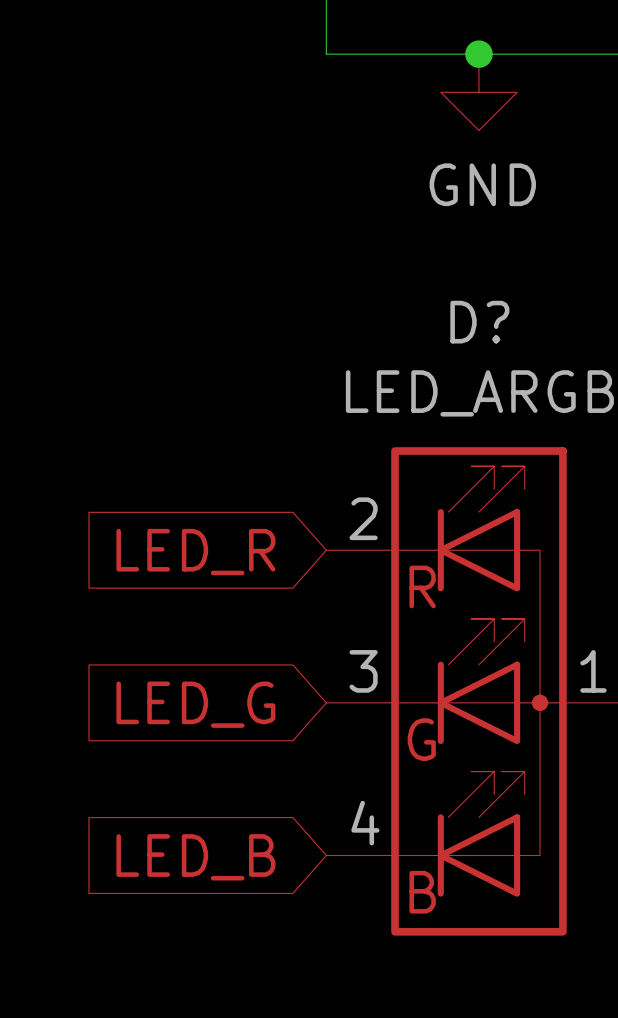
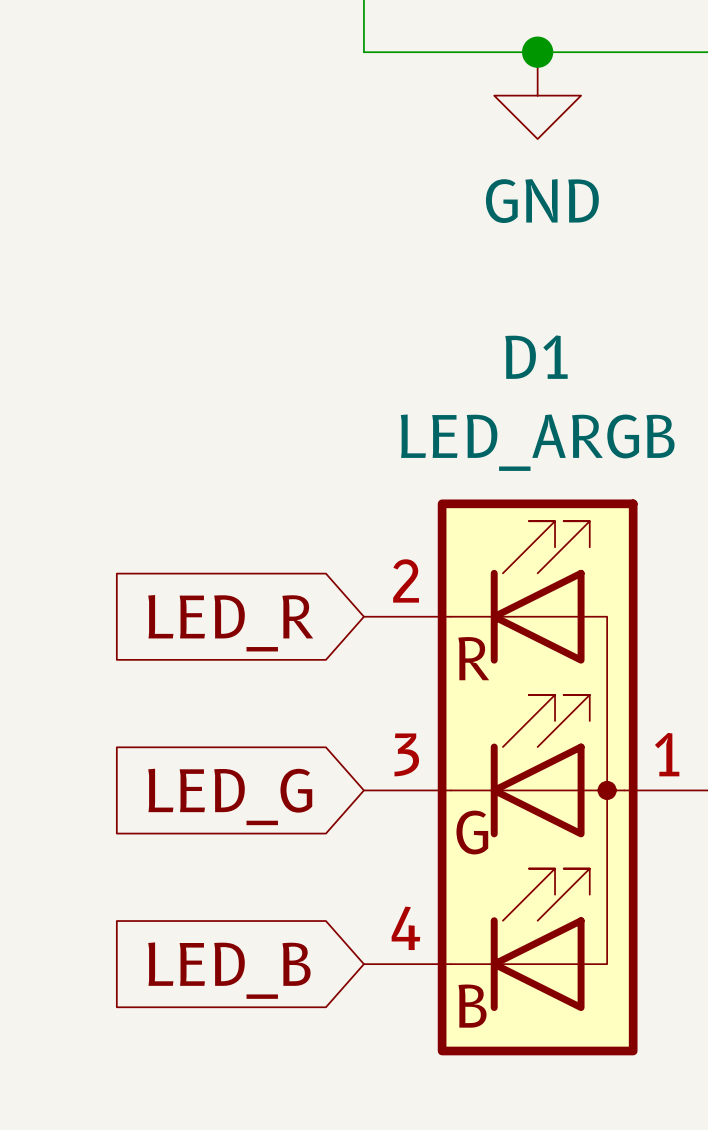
D? name: D? (479, 322) -> D1 (536, 357)

